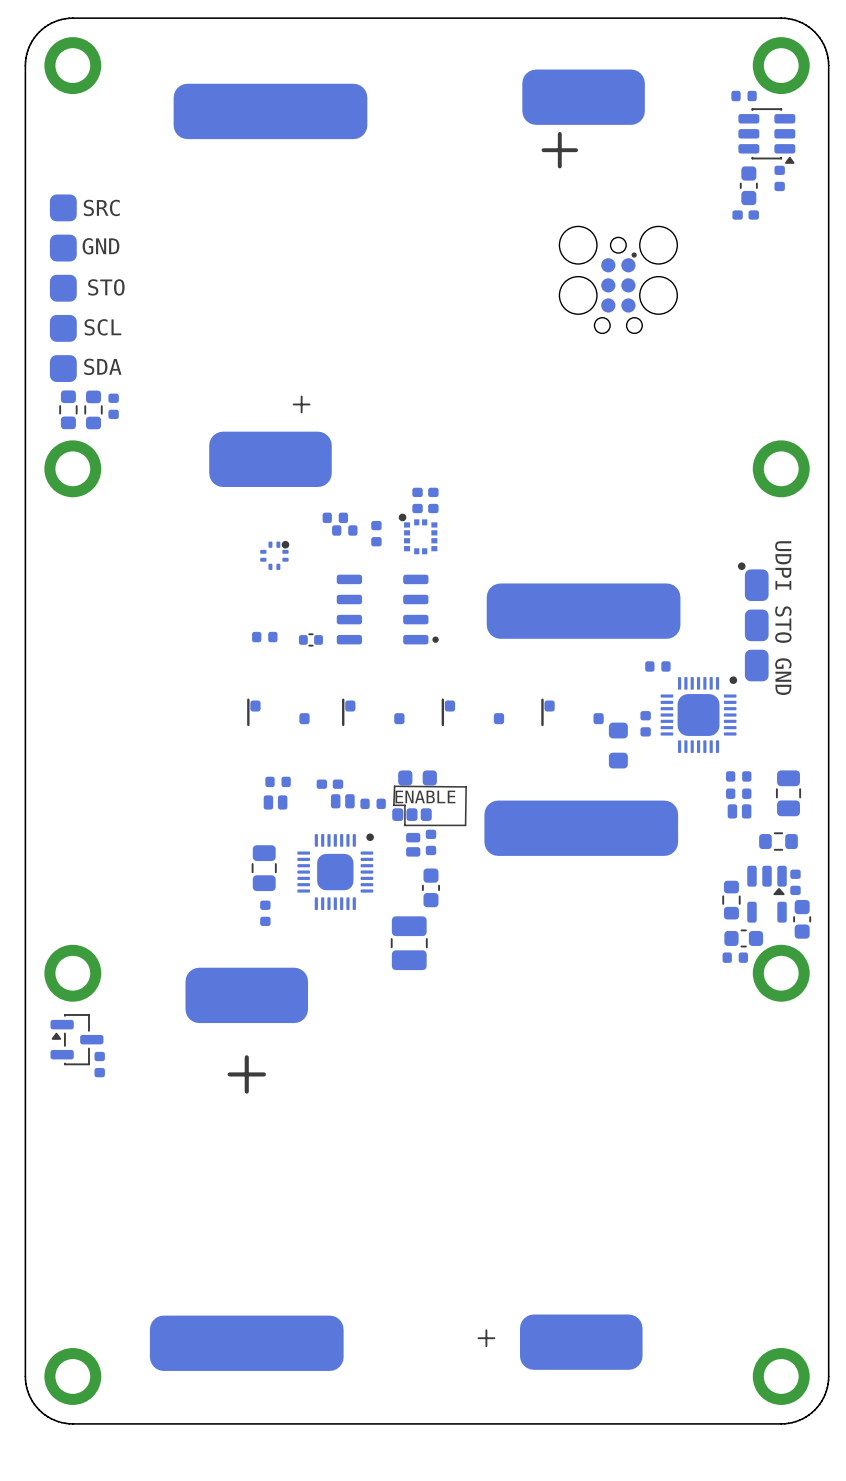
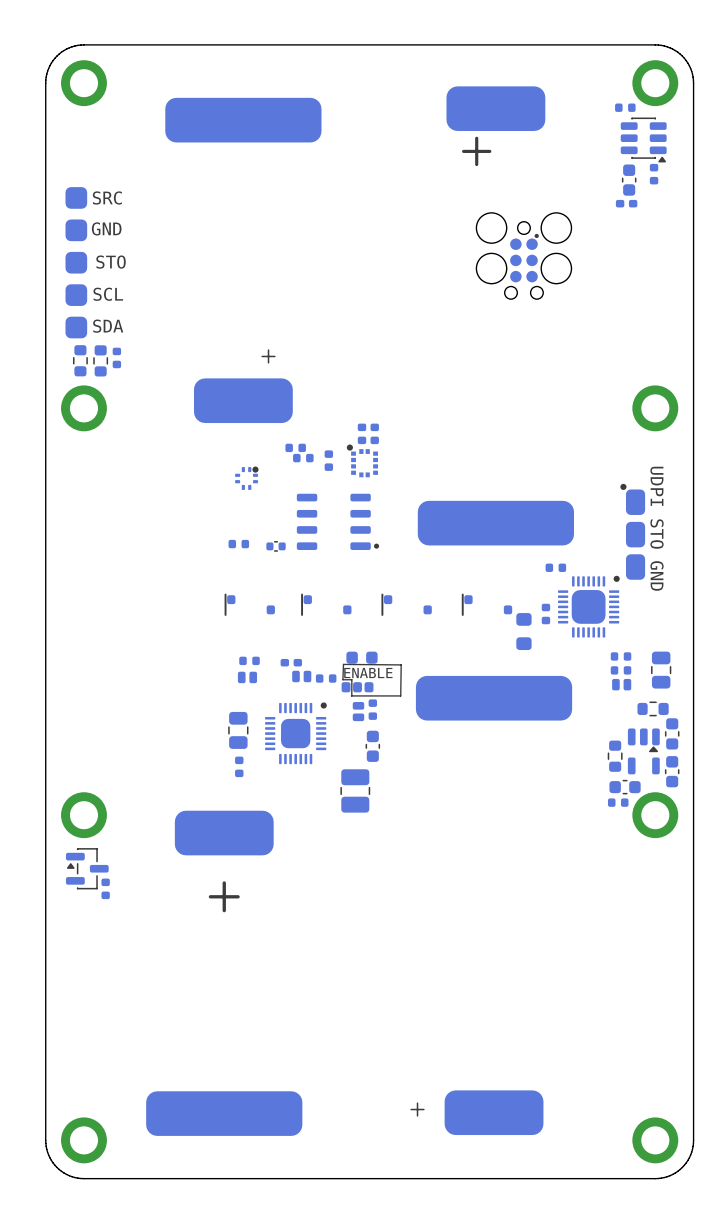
part footprint: [790, 869, 801, 896] -> [664, 718, 680, 750]

